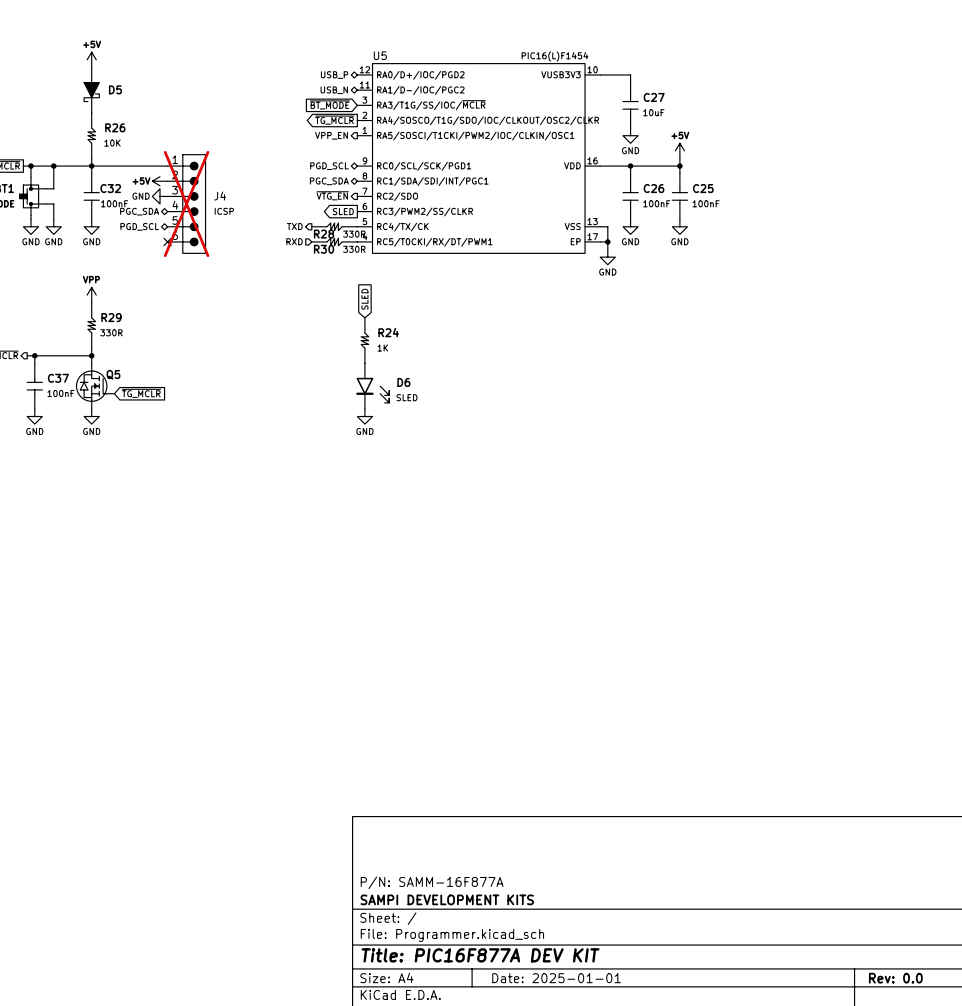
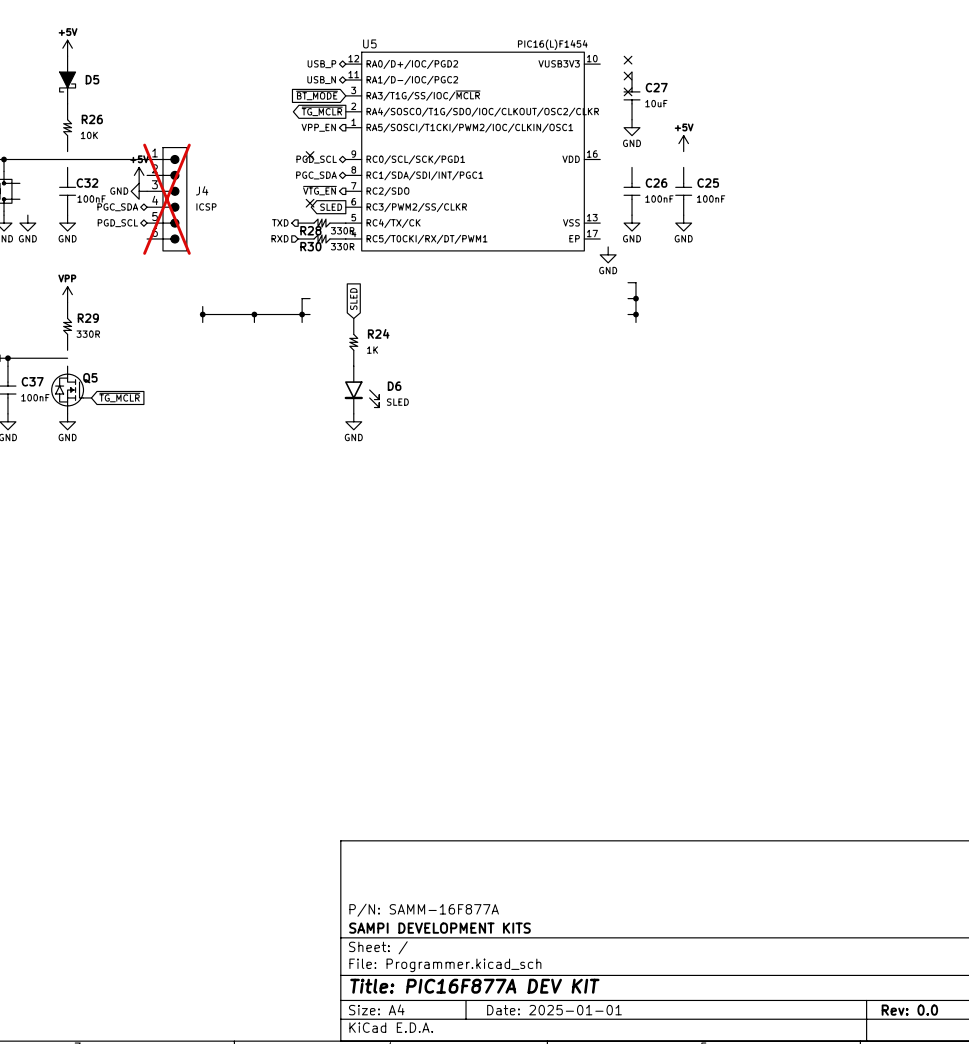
no-connect mark: none -> (628, 60)
wire: (600, 74) (630, 74) (630, 82) -> none
no-connect mark: none -> (628, 76)
no-connect mark: none -> (628, 91)
wire: (91, 158) (91, 173) -> none
wire: (679, 158) (679, 173) -> none
no-connect mark: none -> (310, 155)
wire: (53, 166) (53, 188) (46, 188) -> none
junction: (53, 166) -> none
junction: (91, 166) -> none
wire: (600, 166) (679, 166) -> none
wire: (630, 166) (630, 173) -> none
junction: (630, 166) -> none
junction: (679, 166) -> none
power symbol rotation: 0° (160, 181) -> 90° clockwise (139, 175)
wire: (46, 204) (53, 204) (53, 219) -> none
no-connect mark: none -> (310, 203)
wire: (600, 226) (607, 226) (607, 249) -> none
no-connect mark: (167, 241) -> none
wire: (600, 241) (607, 241) -> (628, 298) (635, 298)
junction: (607, 241) -> none
wire: none -> (628, 282) (635, 282) (635, 322)
wire: none -> (310, 298) (302, 298) (302, 322)
junction: none -> (635, 298)
wire: none -> (202, 314) (310, 314)
junction: none -> (202, 314)
wire: none -> (254, 314) (254, 322)
junction: none -> (254, 314)
junction: none -> (302, 314)
wire: none -> (628, 314) (635, 314)
junction: none -> (635, 314)
wire: (91, 348) (91, 363) -> (202, 306) (202, 322)
junction: (91, 355) -> none

